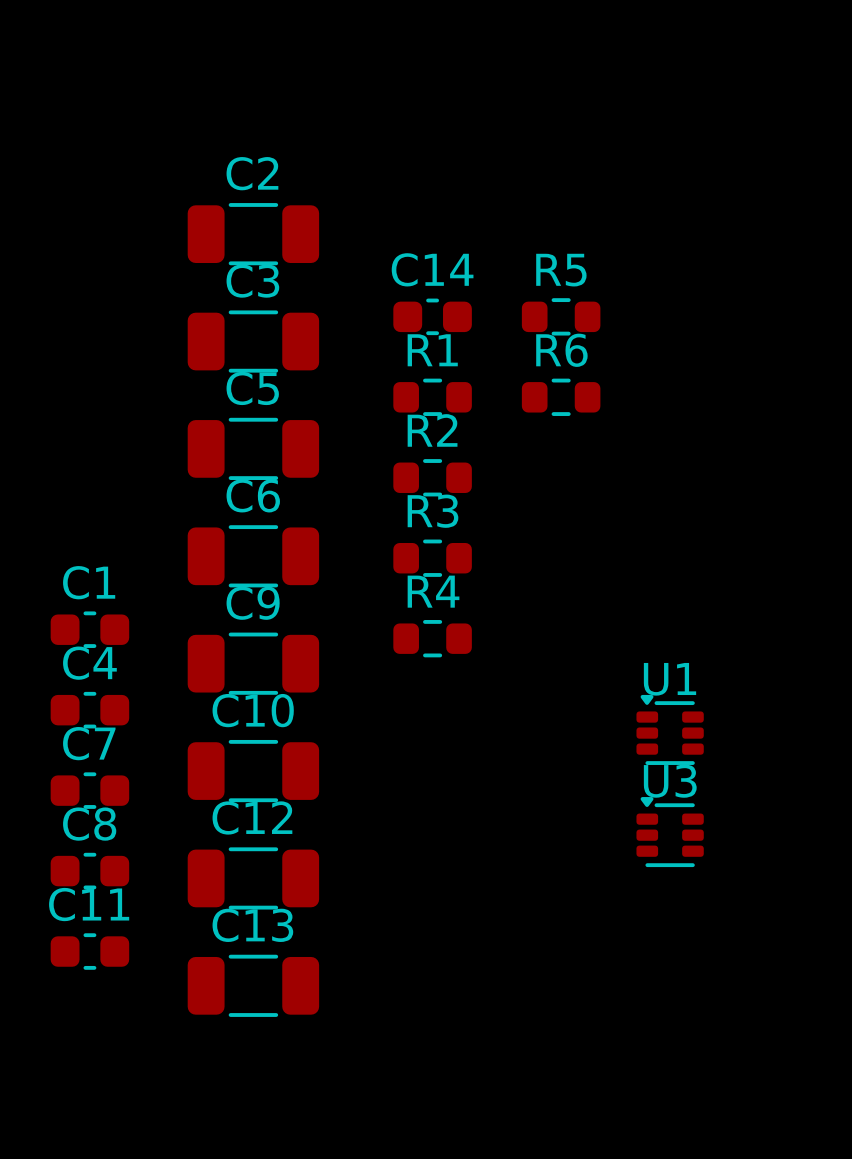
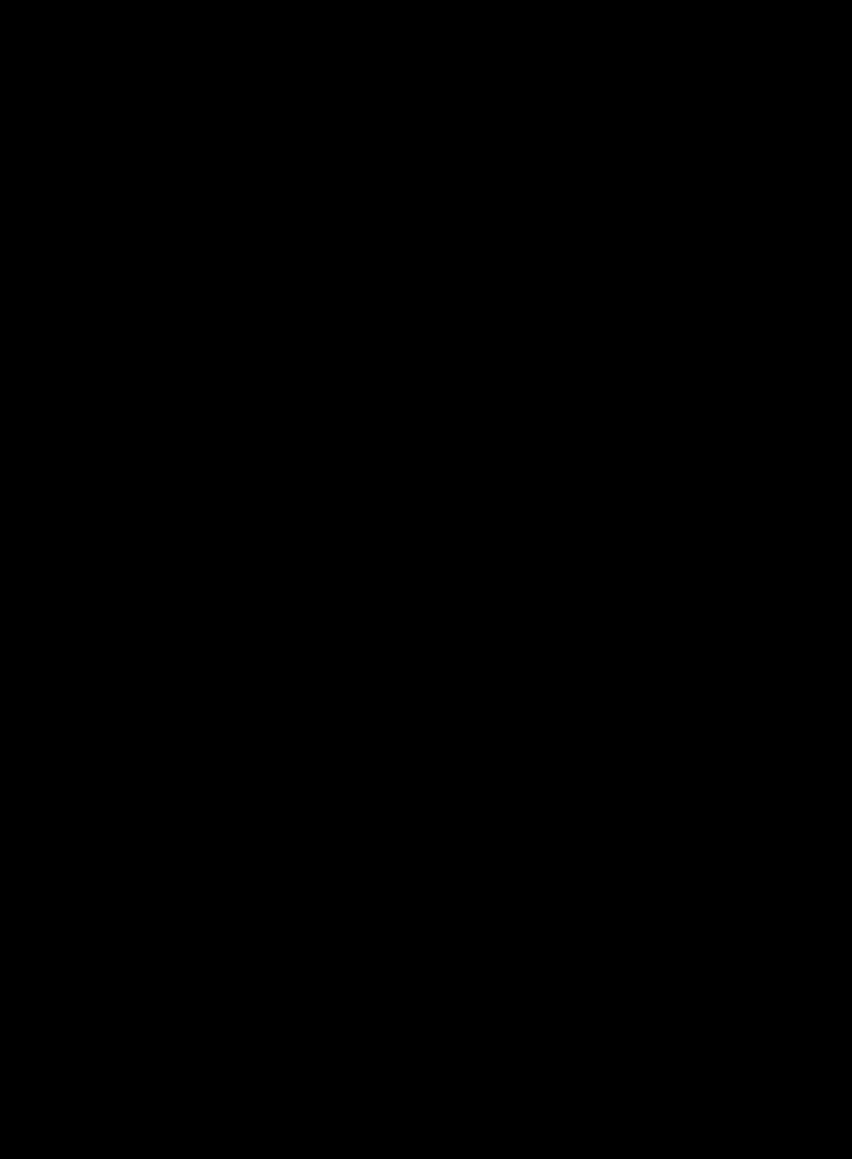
C2: (253, 234) -> none
C14: (432, 316) -> none
R5: (561, 316) -> none
C3: (253, 341) -> none
R1: (432, 397) -> none
R6: (561, 397) -> none
C5: (253, 448) -> none
R2: (432, 477) -> none
C6: (253, 556) -> none
R3: (432, 558) -> none
C1: (89, 629) -> none
R4: (432, 638) -> none
C9: (253, 663) -> none
C4: (89, 710) -> none
U1: (670, 729) -> none
C10: (253, 771) -> none
C7: (89, 790) -> none
U3: (670, 832) -> none
C8: (89, 871) -> none
C12: (253, 878) -> none
C11: (89, 951) -> none
C13: (253, 985) -> none

